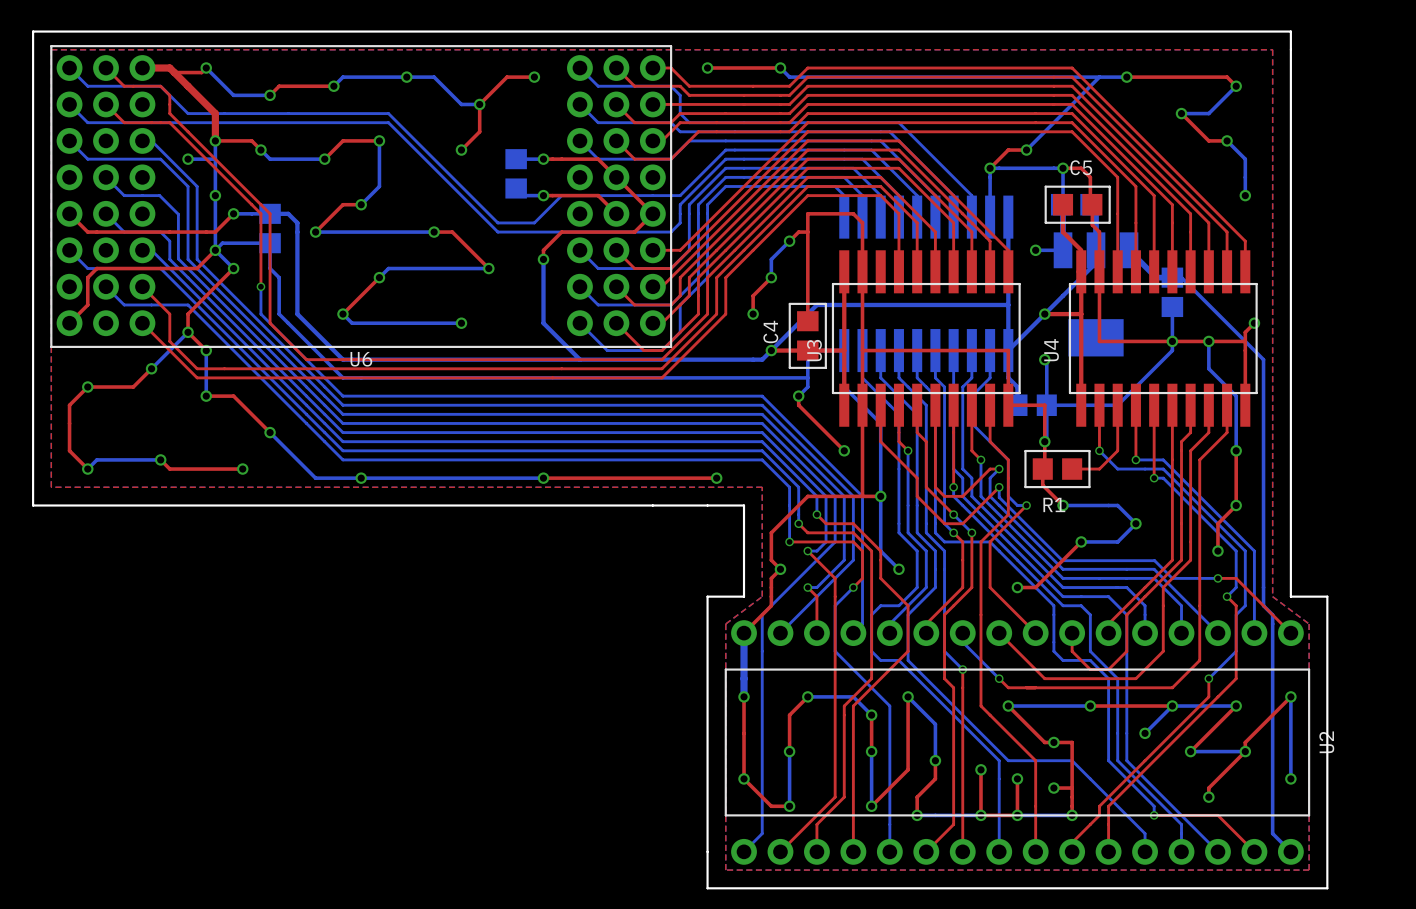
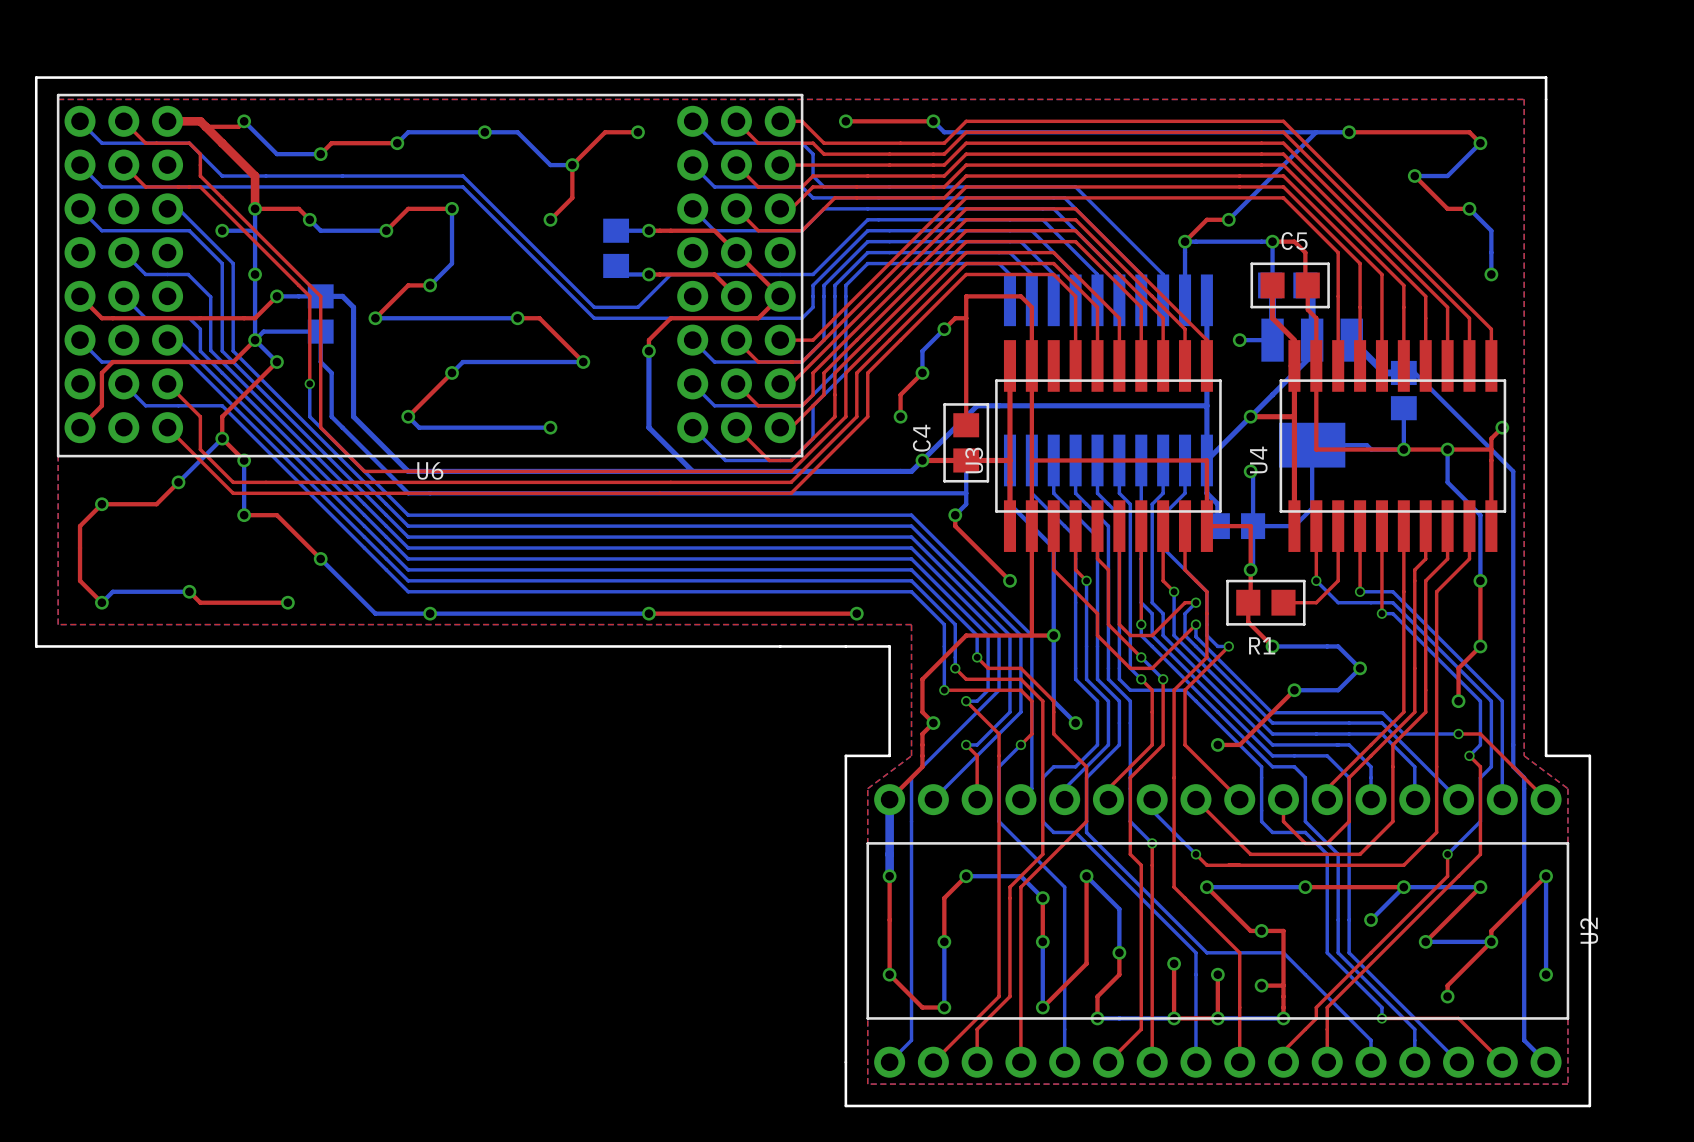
bottom track: (1172, 341) (1172, 350) (1117, 405) (1081, 405) -> (1403, 449) (1371, 449) (1366, 445) (1312, 445) (1312, 508) (1294, 526)

